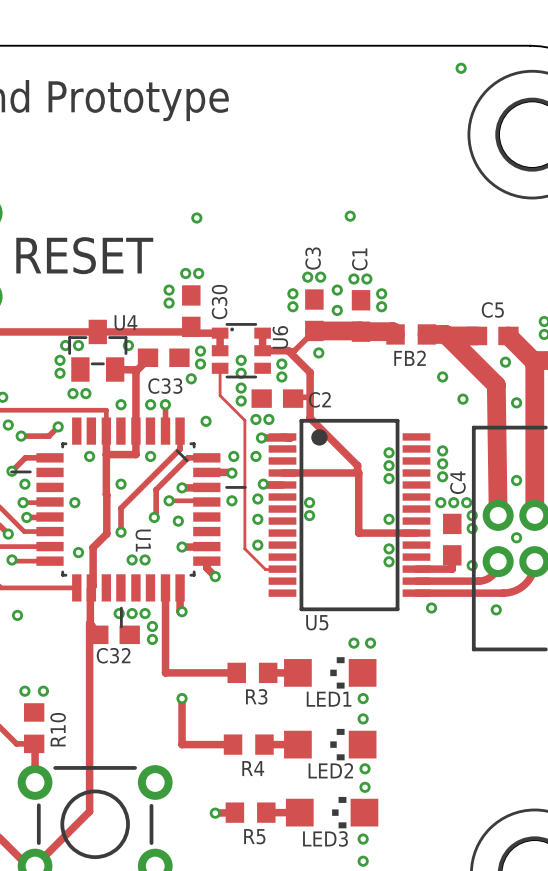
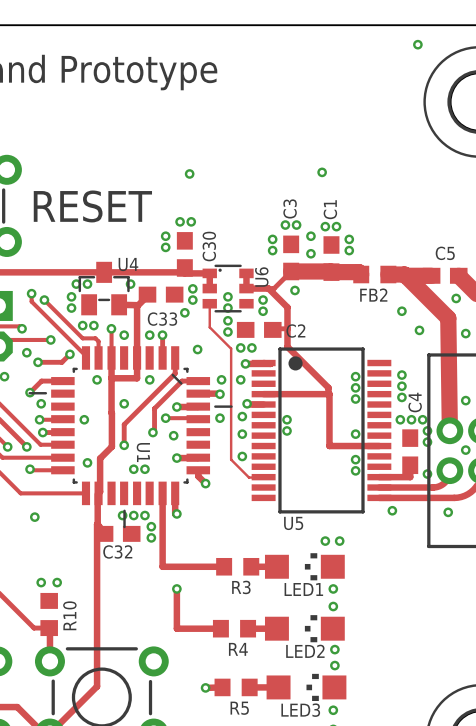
track: none -> (31, 293) (31, 301) (86, 357)
via: none -> (31, 293)
track: none -> (44, 300) (82, 338) (95, 338) (98, 341) (98, 357)
via: none -> (44, 300)
via: none -> (111, 328)
track: (36, 410) (106, 410) -> (111, 328) (111, 339)
via: none -> (50, 339)

